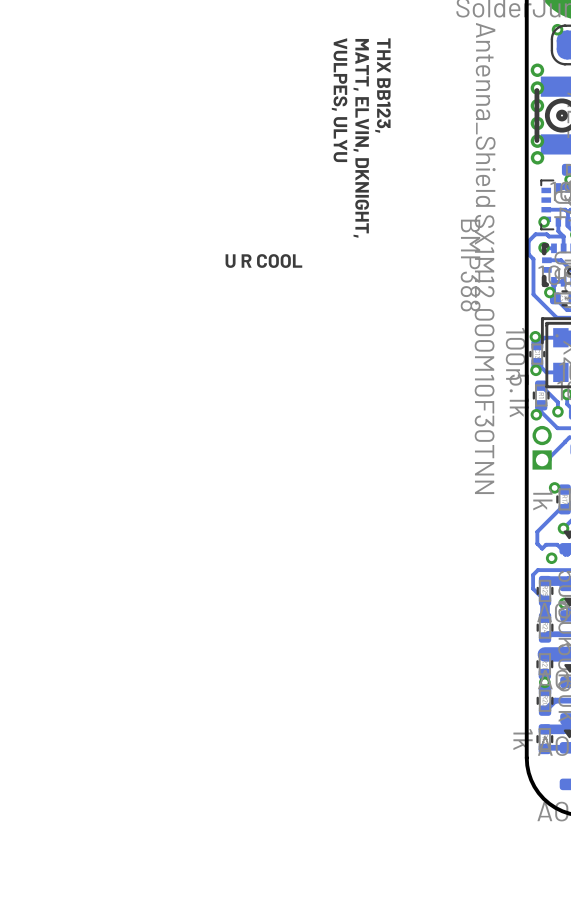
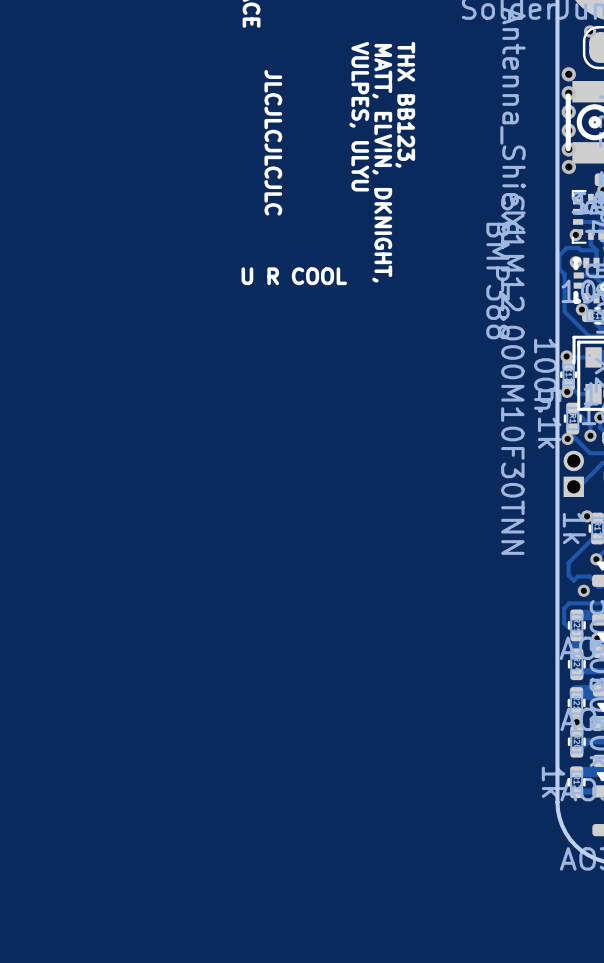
text: none -> JLCJLCJLCJLC (273, 142)

